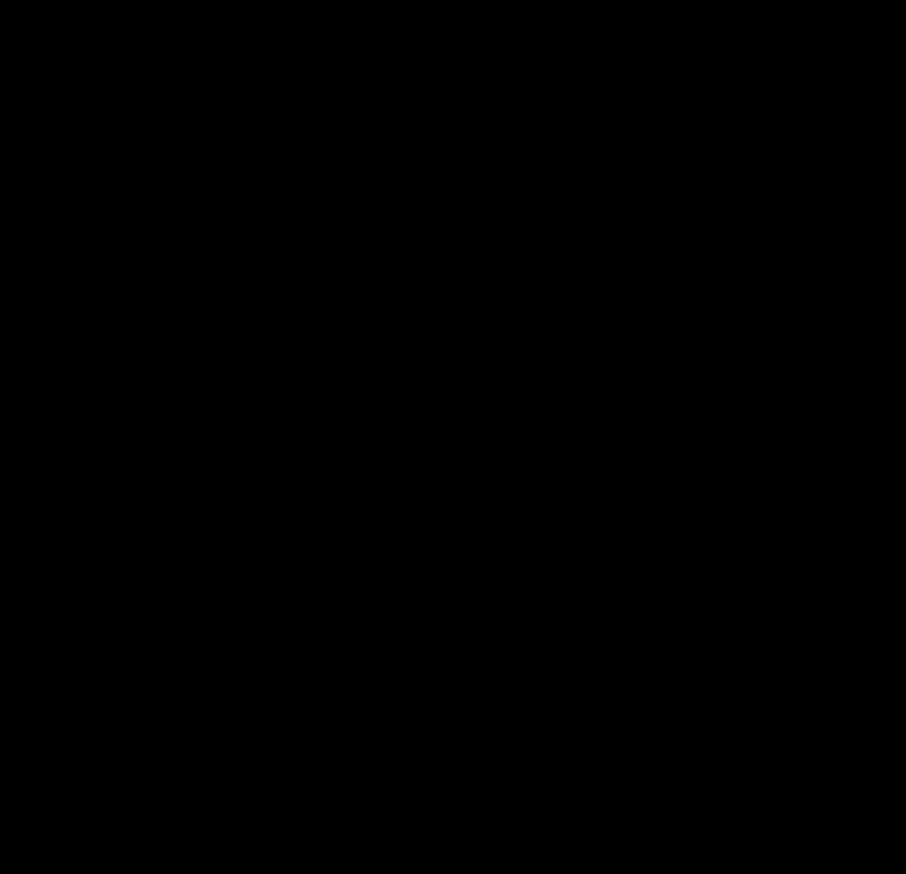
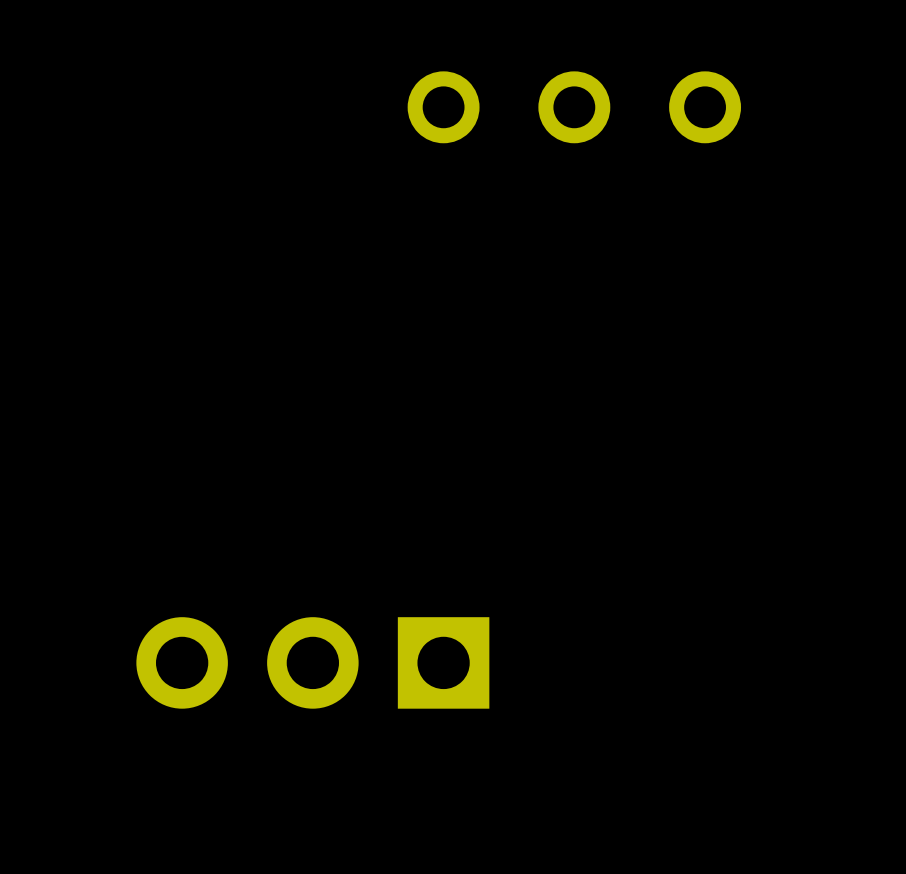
part: none -> (574, 107)
part: none -> (312, 662)

